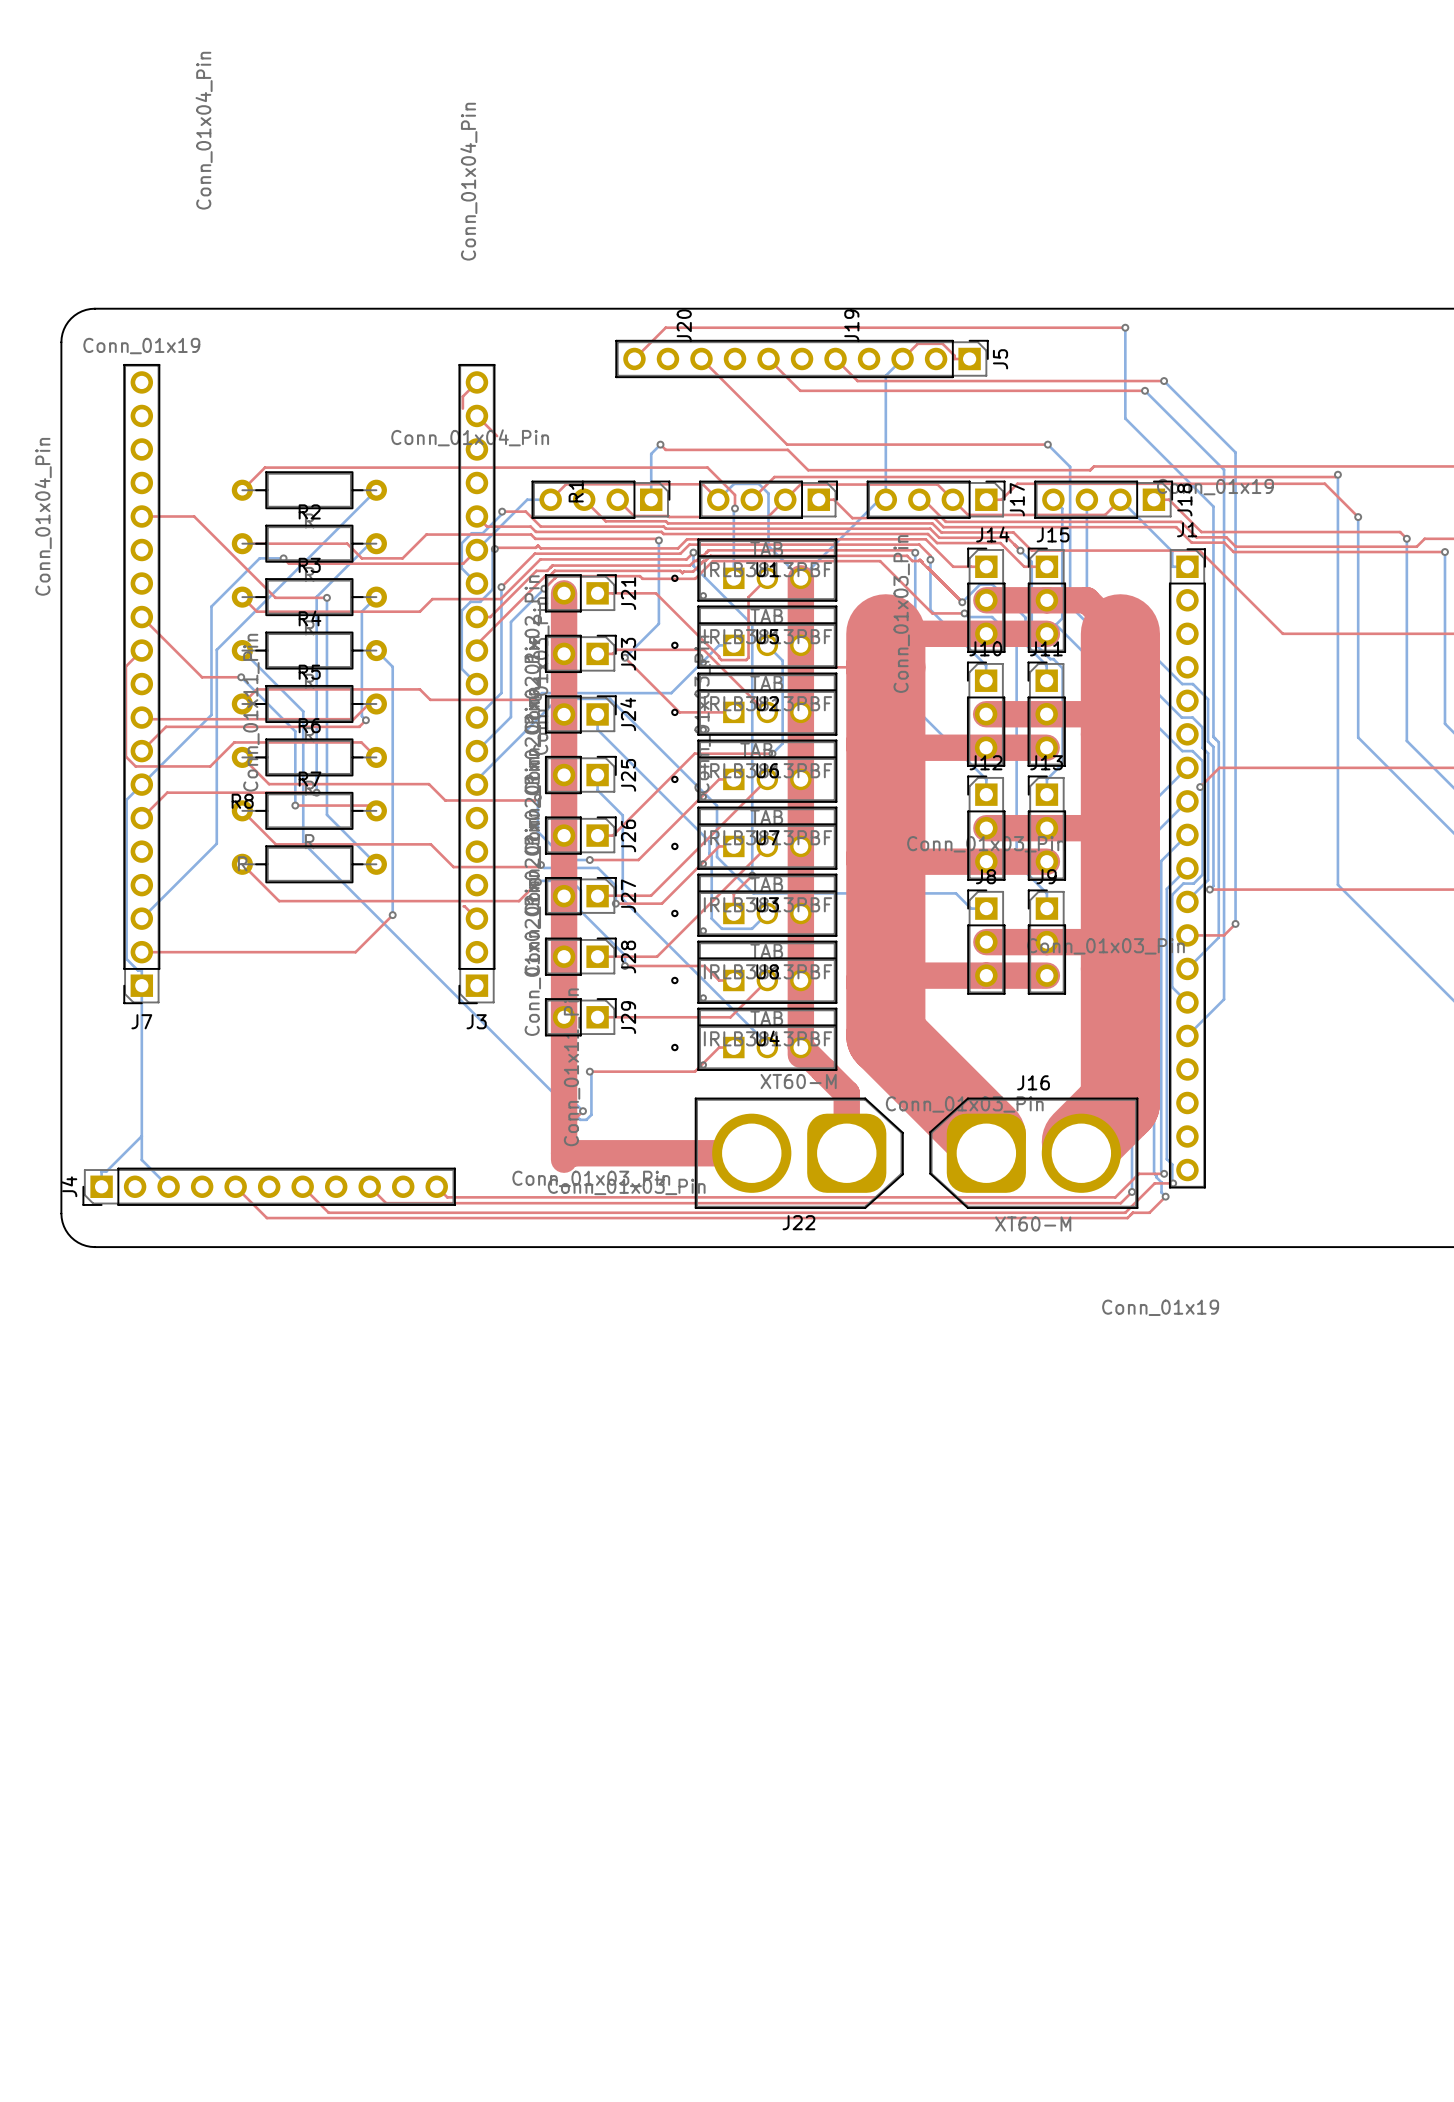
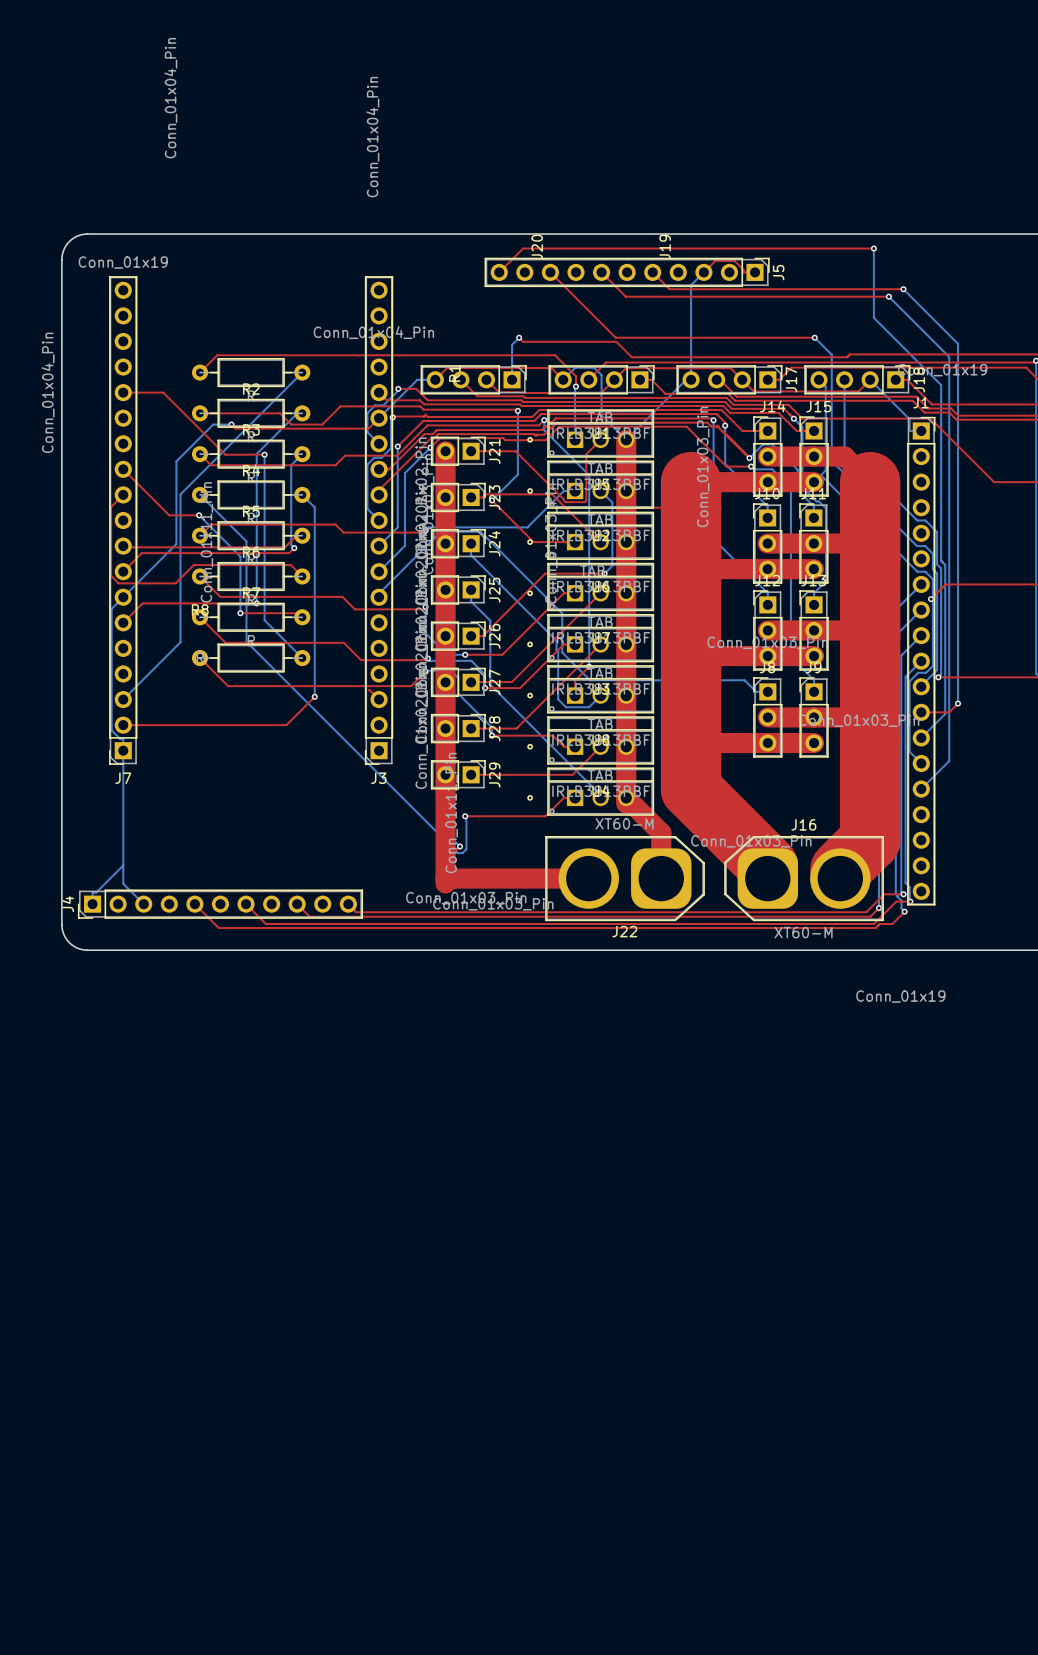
top track: (476, 382) (462, 396) (462, 408) -> none
top track: (476, 415) (497, 436) -> none

